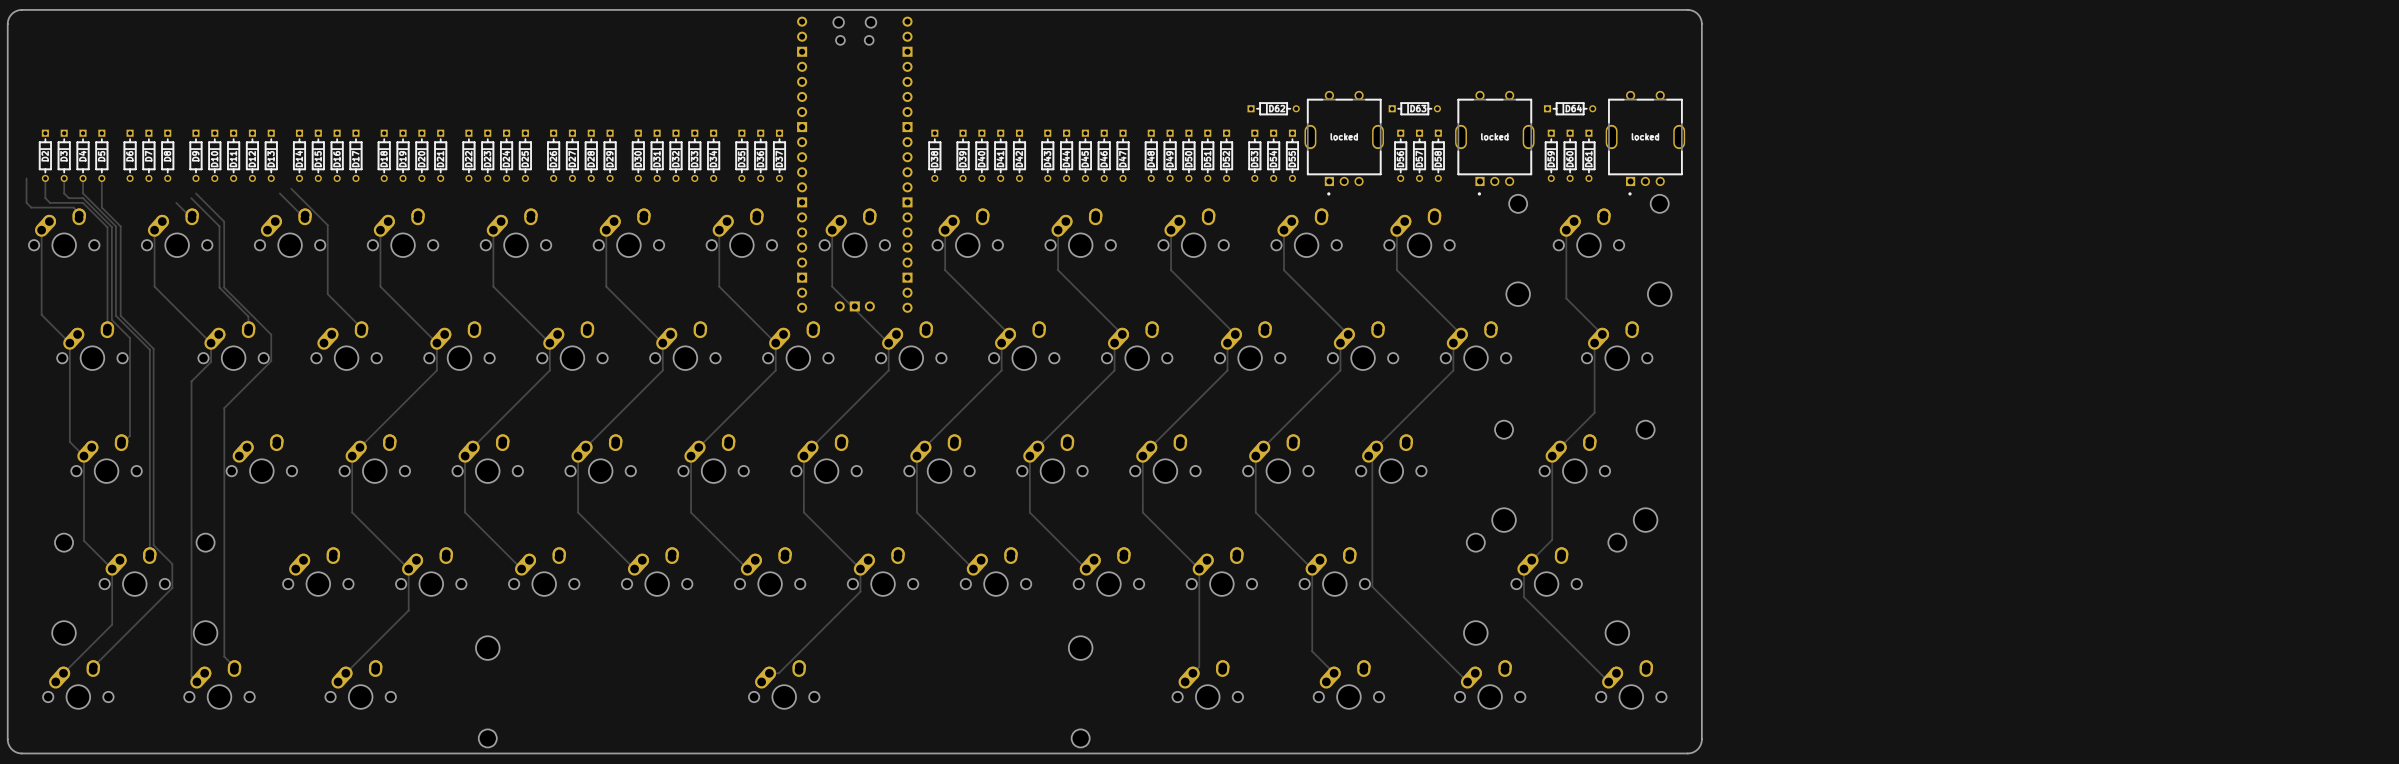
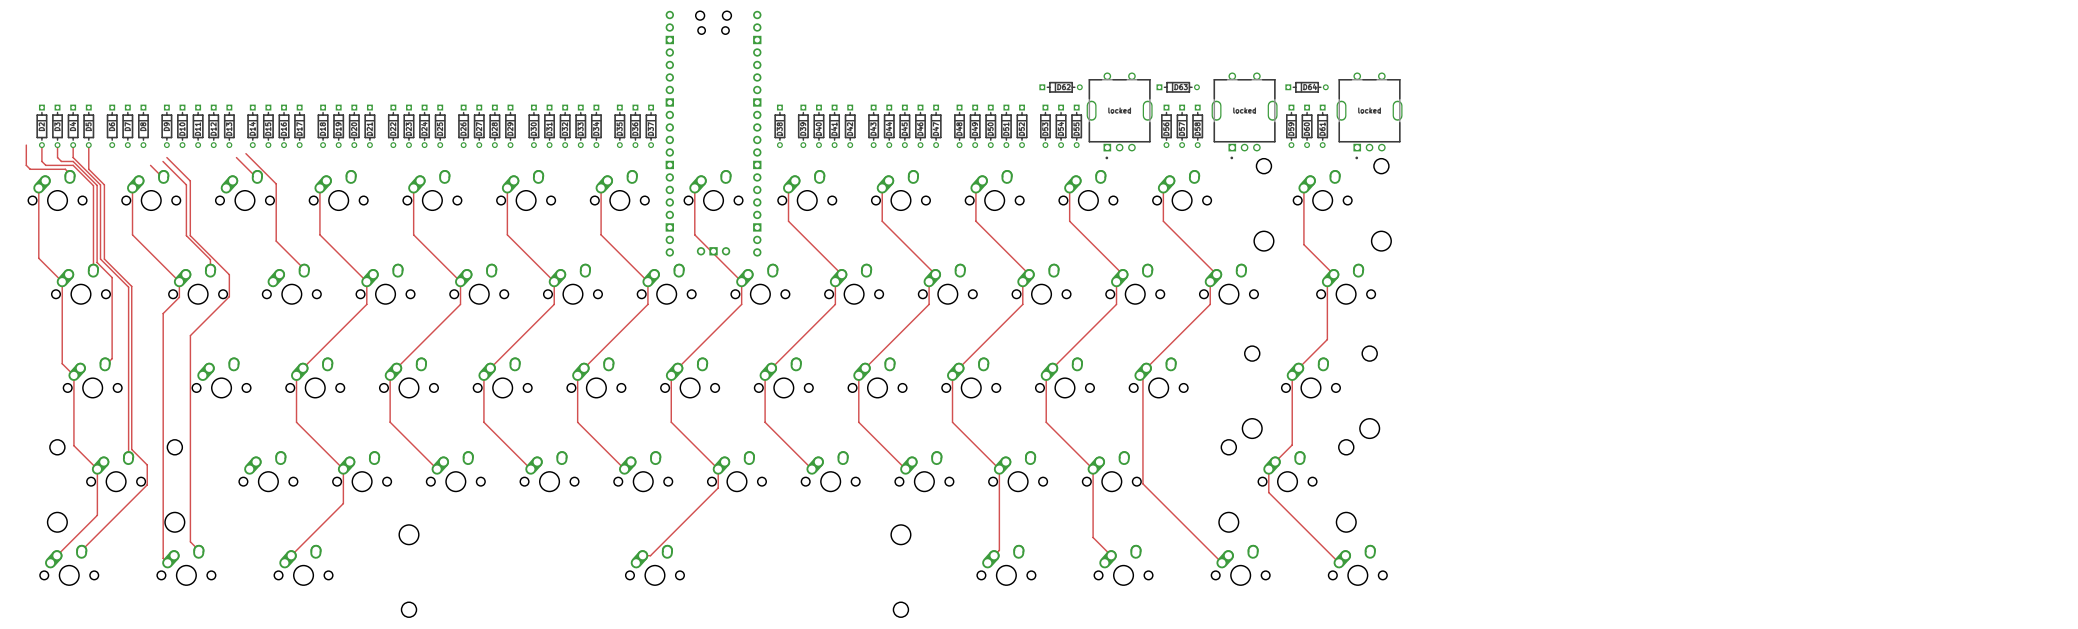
board edge: (21, 9) (1693, 11) (1698, 15) (1701, 24) (1700, 744) (1694, 751) (1687, 753) (16, 752) (9, 746) (7, 739) (7, 24) (11, 14) (21, 9) -> none

